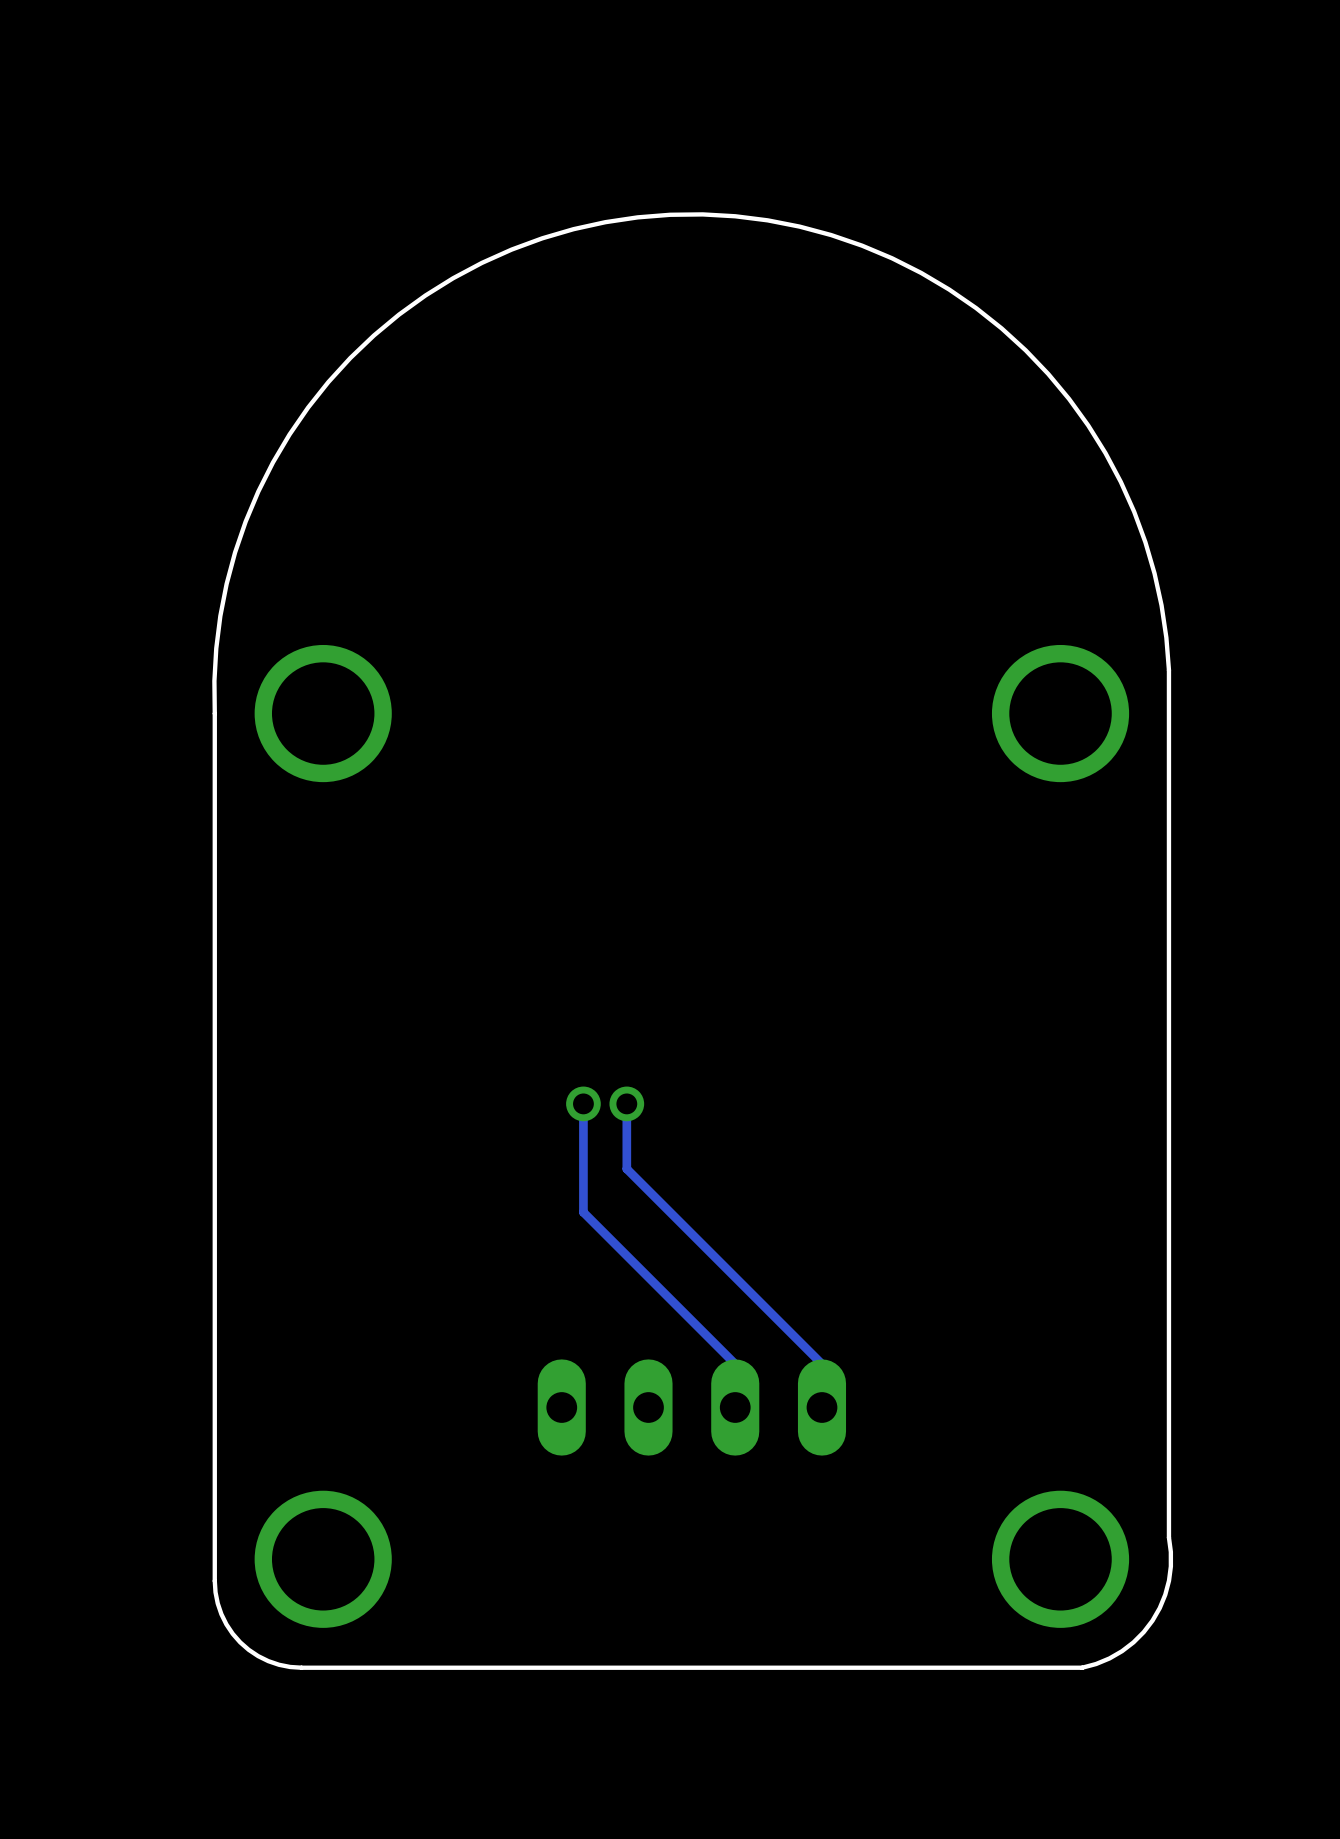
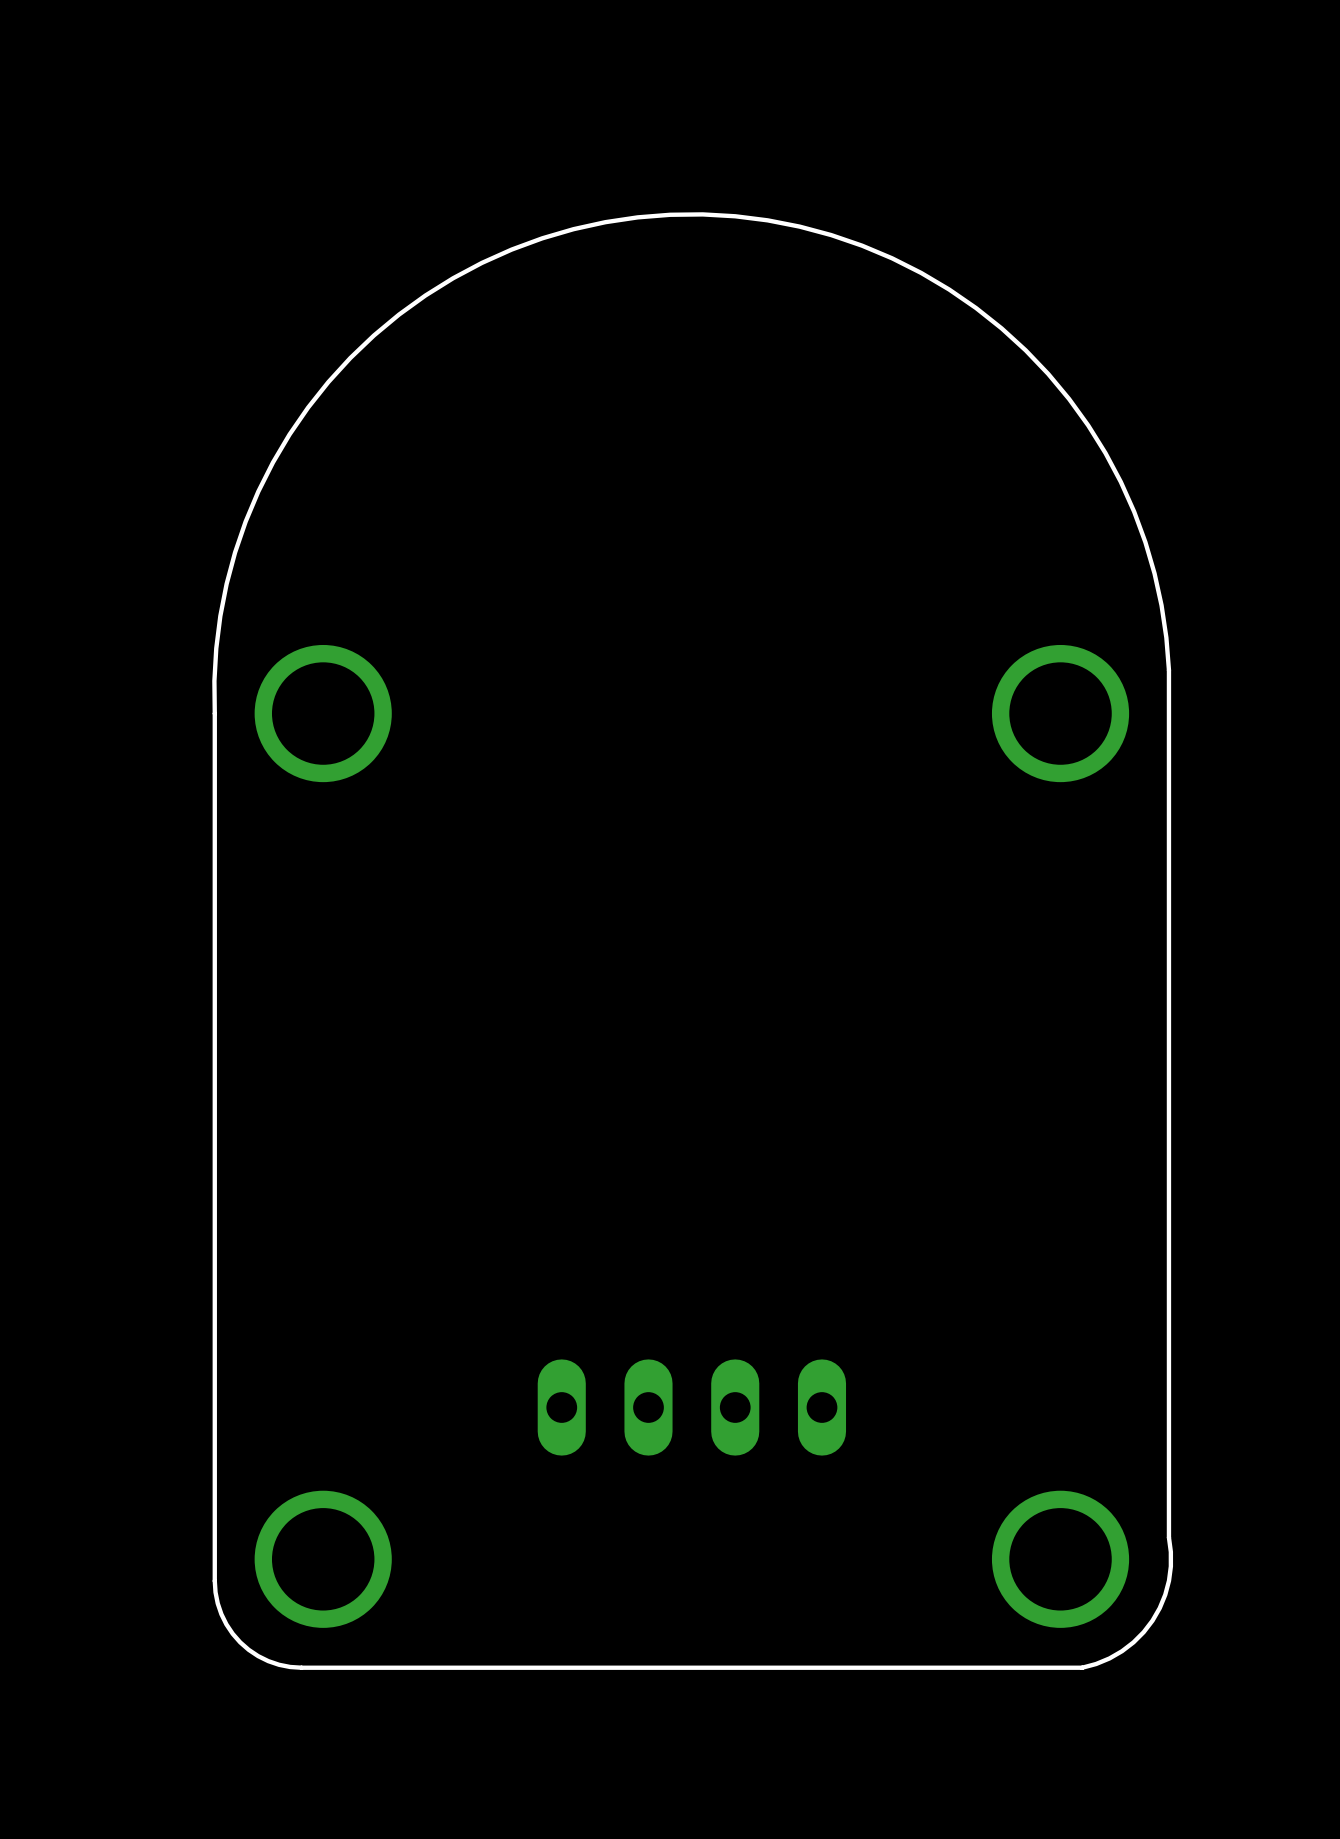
track: (583, 1103) (583, 1212) (735, 1364) (735, 1407) -> none
via: (583, 1103) -> none
track: (626, 1103) (626, 1168) (821, 1364) (821, 1407) -> none
via: (626, 1103) -> none

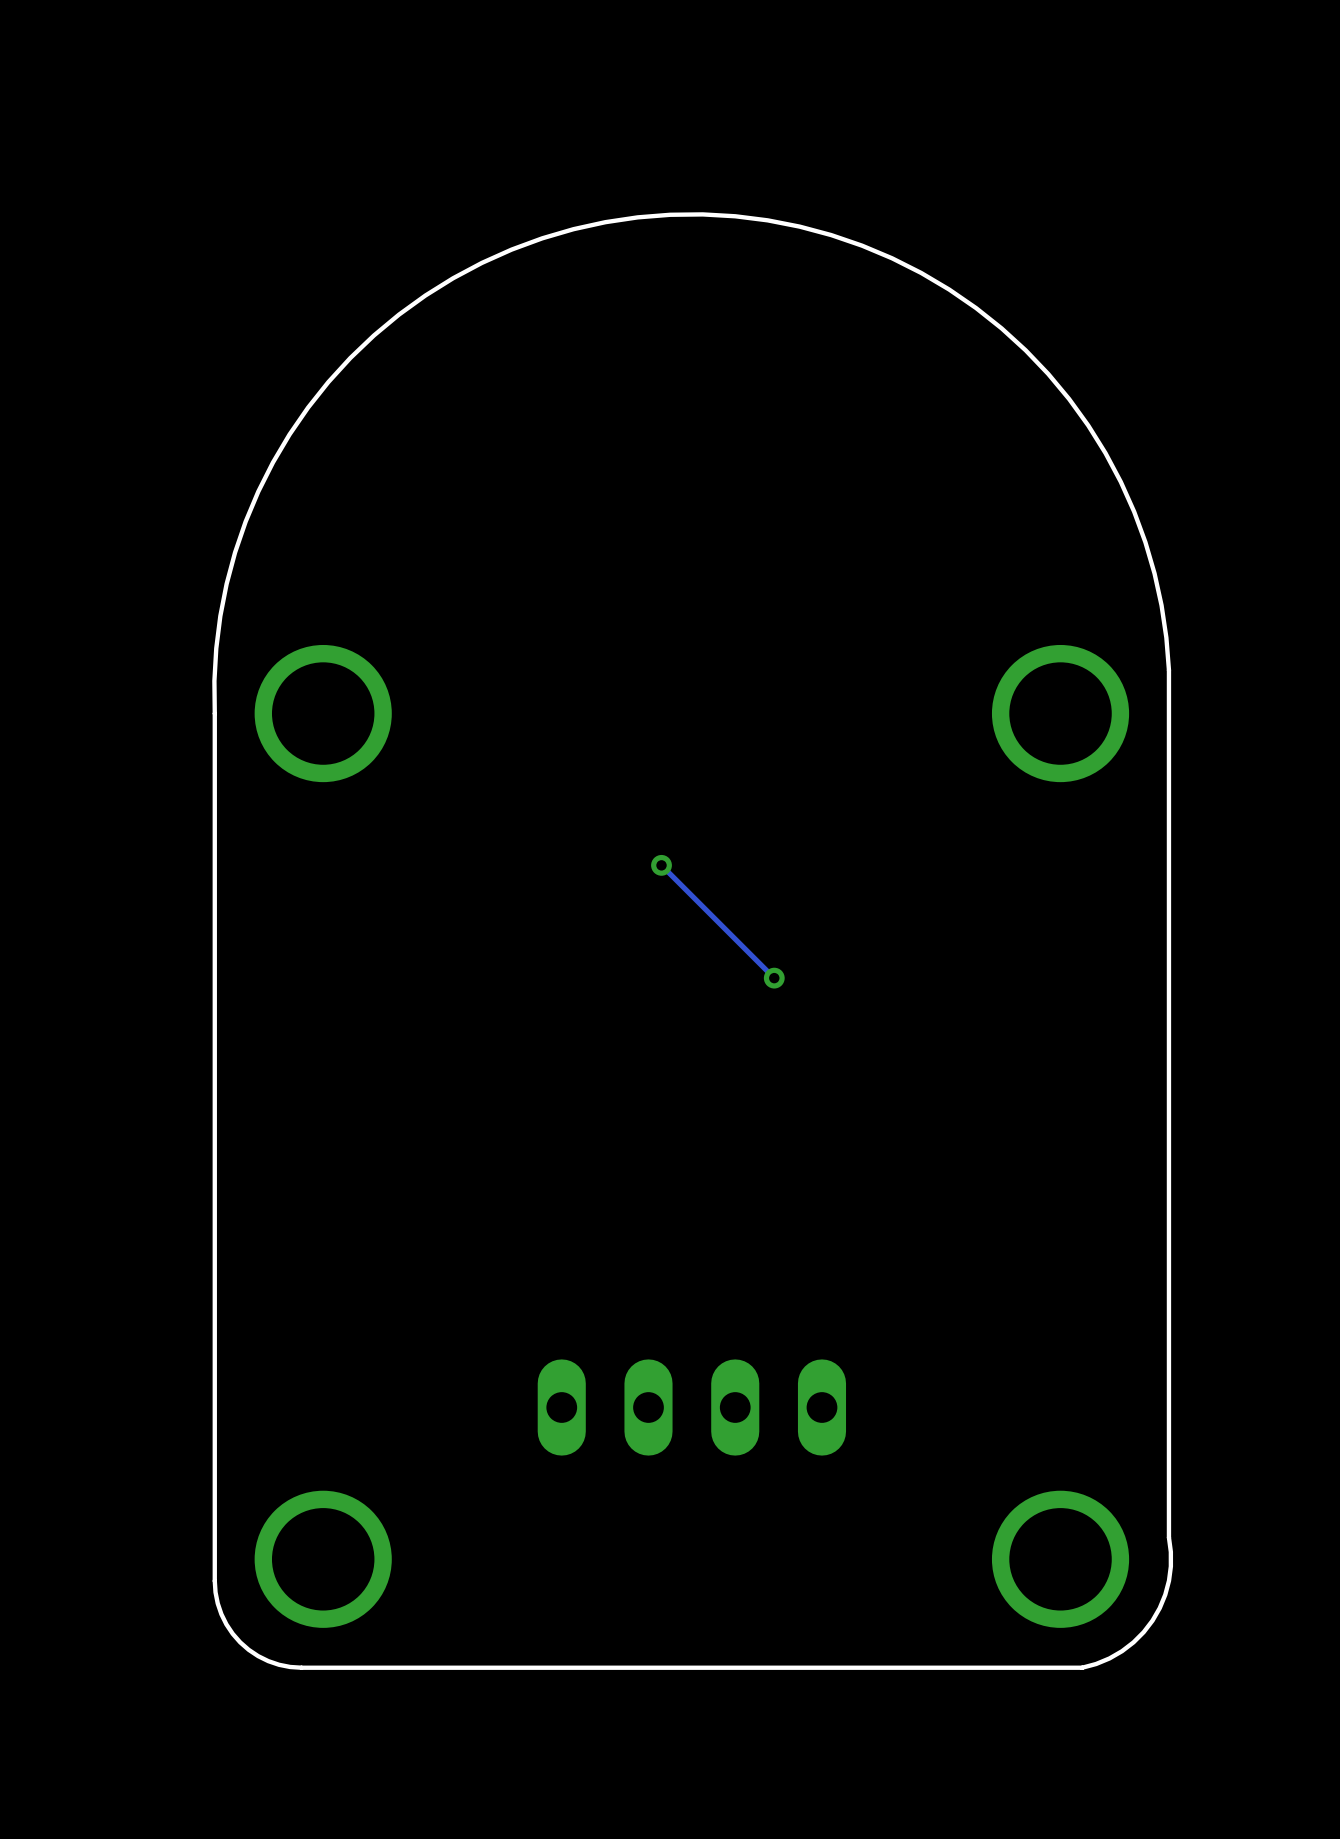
track: none -> (661, 865) (774, 978)
via: none -> (661, 865)
via: none -> (774, 978)

